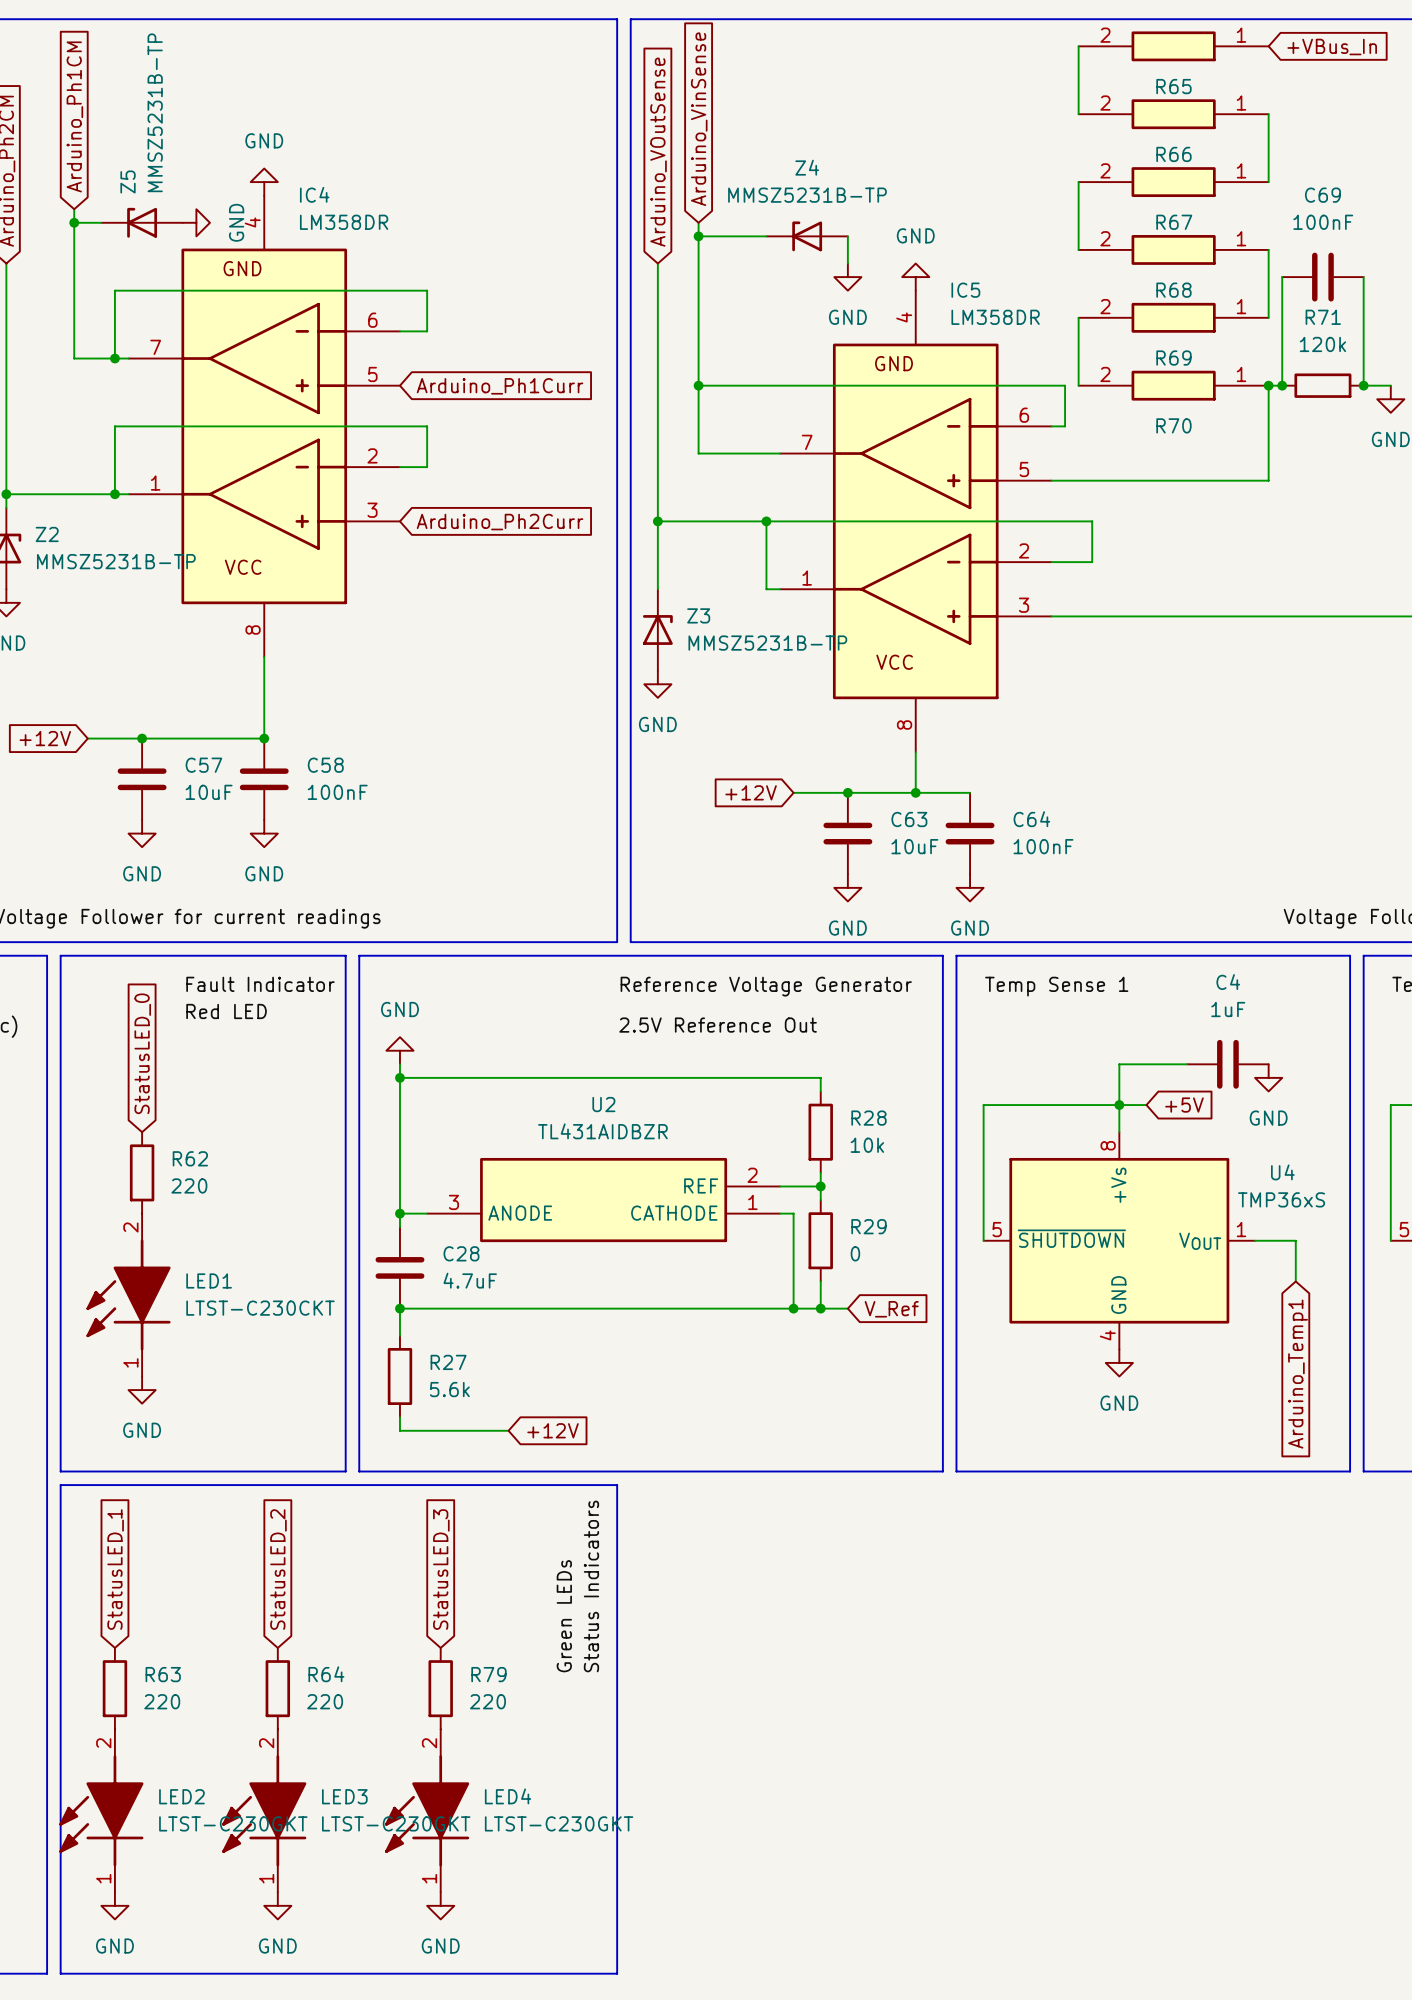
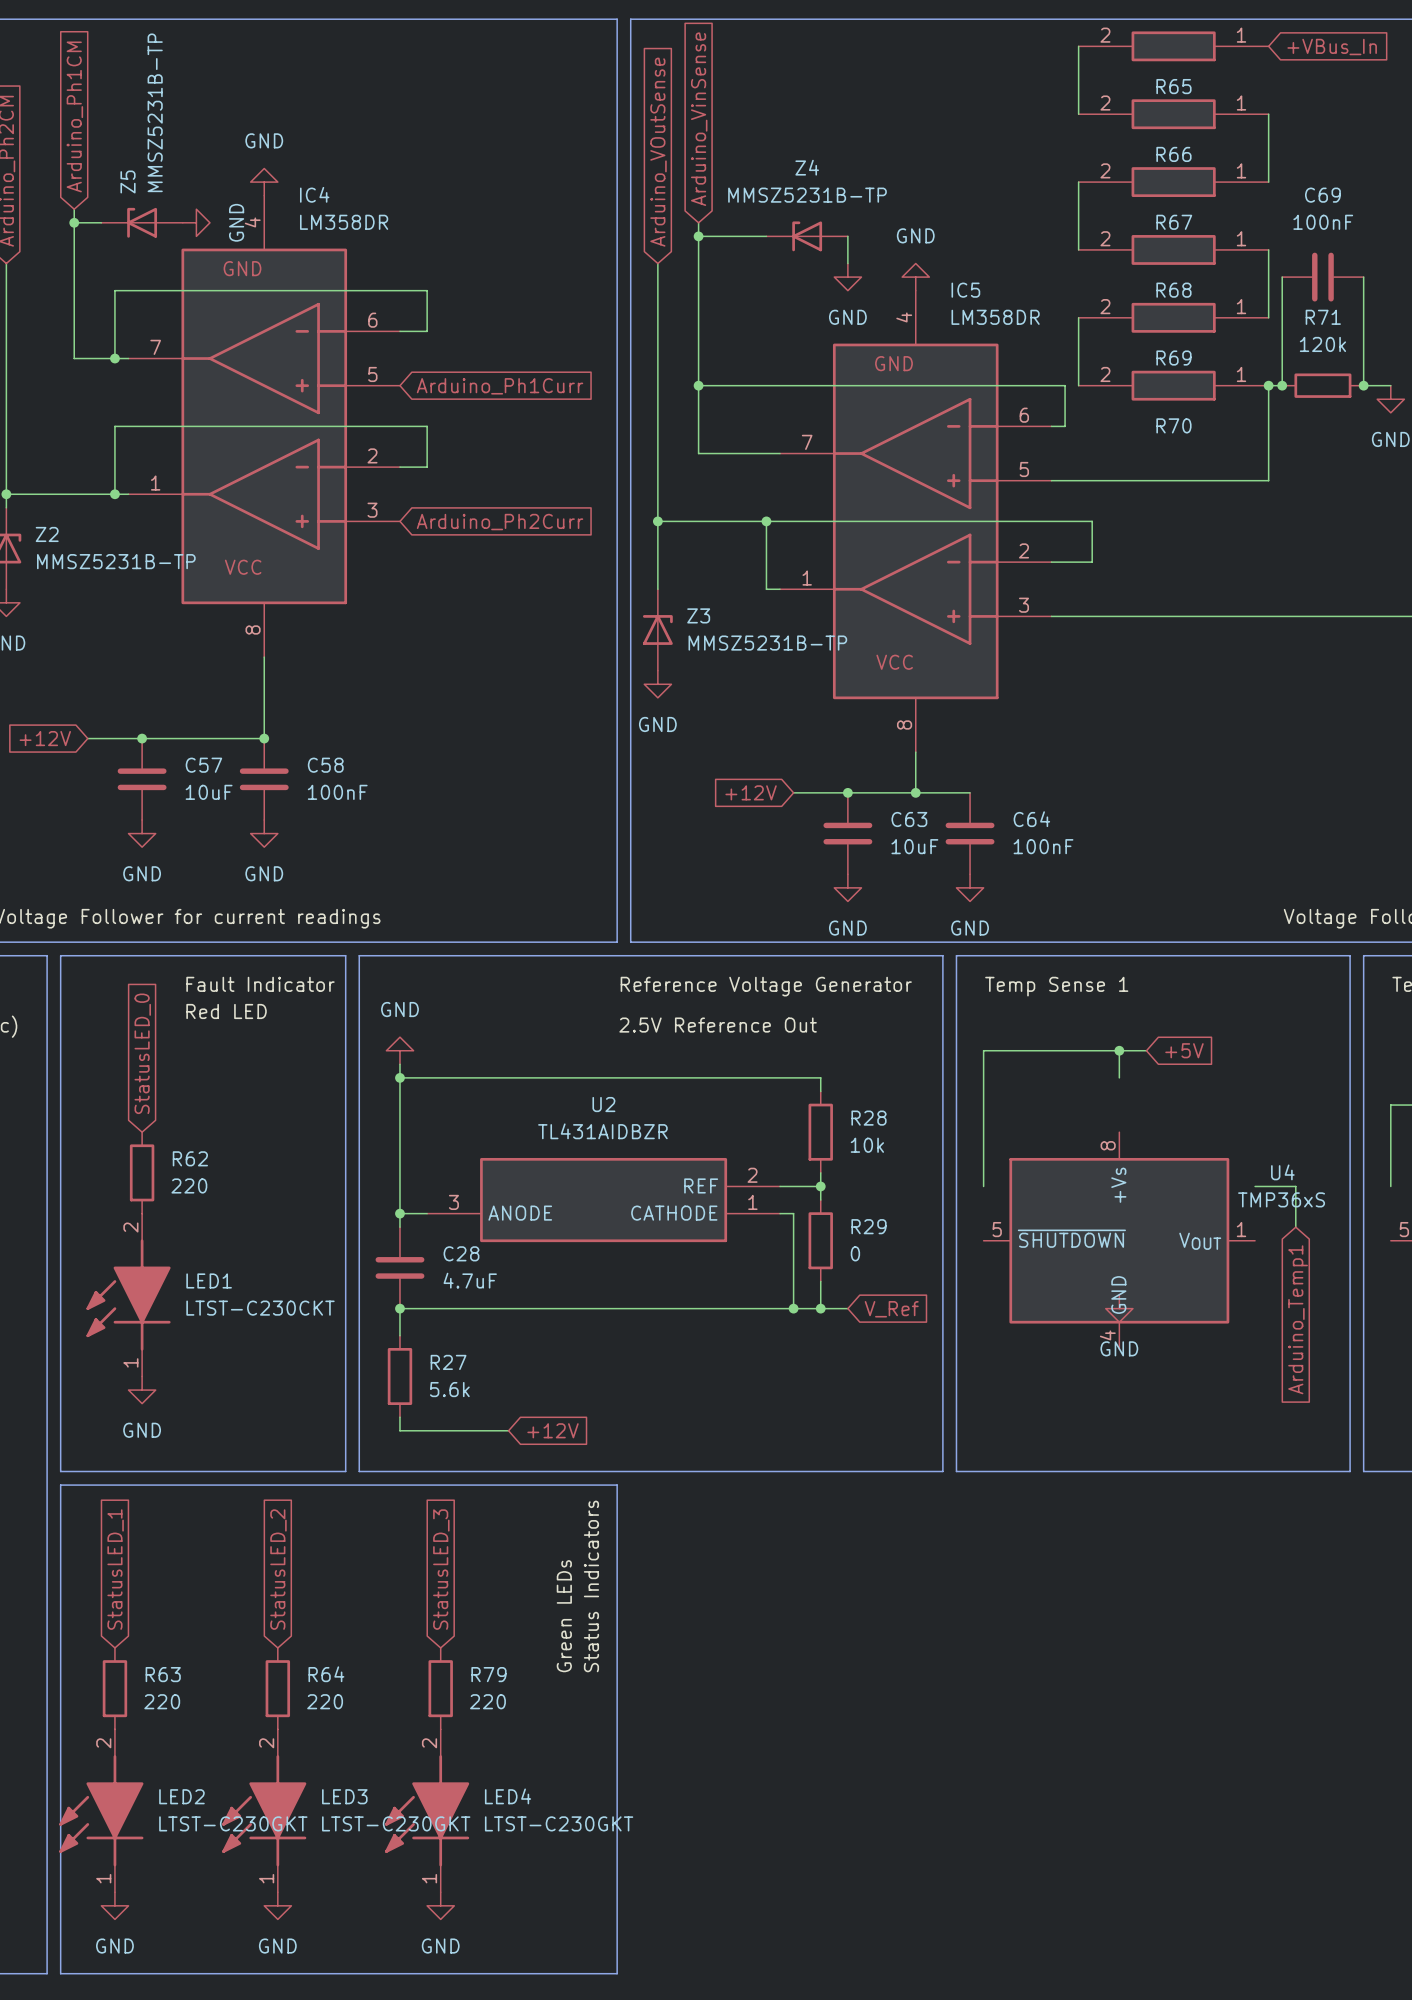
wire: (1119, 1064) (1187, 1064) -> (1119, 1064) (1119, 1050)
C4: 1uF (1227, 1064) -> none
wire: (1119, 1077) (1119, 1132) -> none
power symbol: GND (1268, 1077) -> none
wire: (983, 1105) (1146, 1105) -> (983, 1105) (983, 1050) (1146, 1050)
junction position: (1119, 1105) -> (1119, 1050)
global label position: +5V (1184, 1105) -> +5V (1184, 1050)
wire: (983, 1186) (983, 1240) -> none
wire: (1390, 1186) (1390, 1240) -> none
wire: (1255, 1240) (1295, 1240) (1295, 1281) -> (1255, 1186) (1295, 1186) (1295, 1227)
power symbol position: GND (1119, 1362) -> GND (1119, 1308)
global label position: Arduino_Temp1 (1298, 1374) -> Arduino_Temp1 (1298, 1319)

